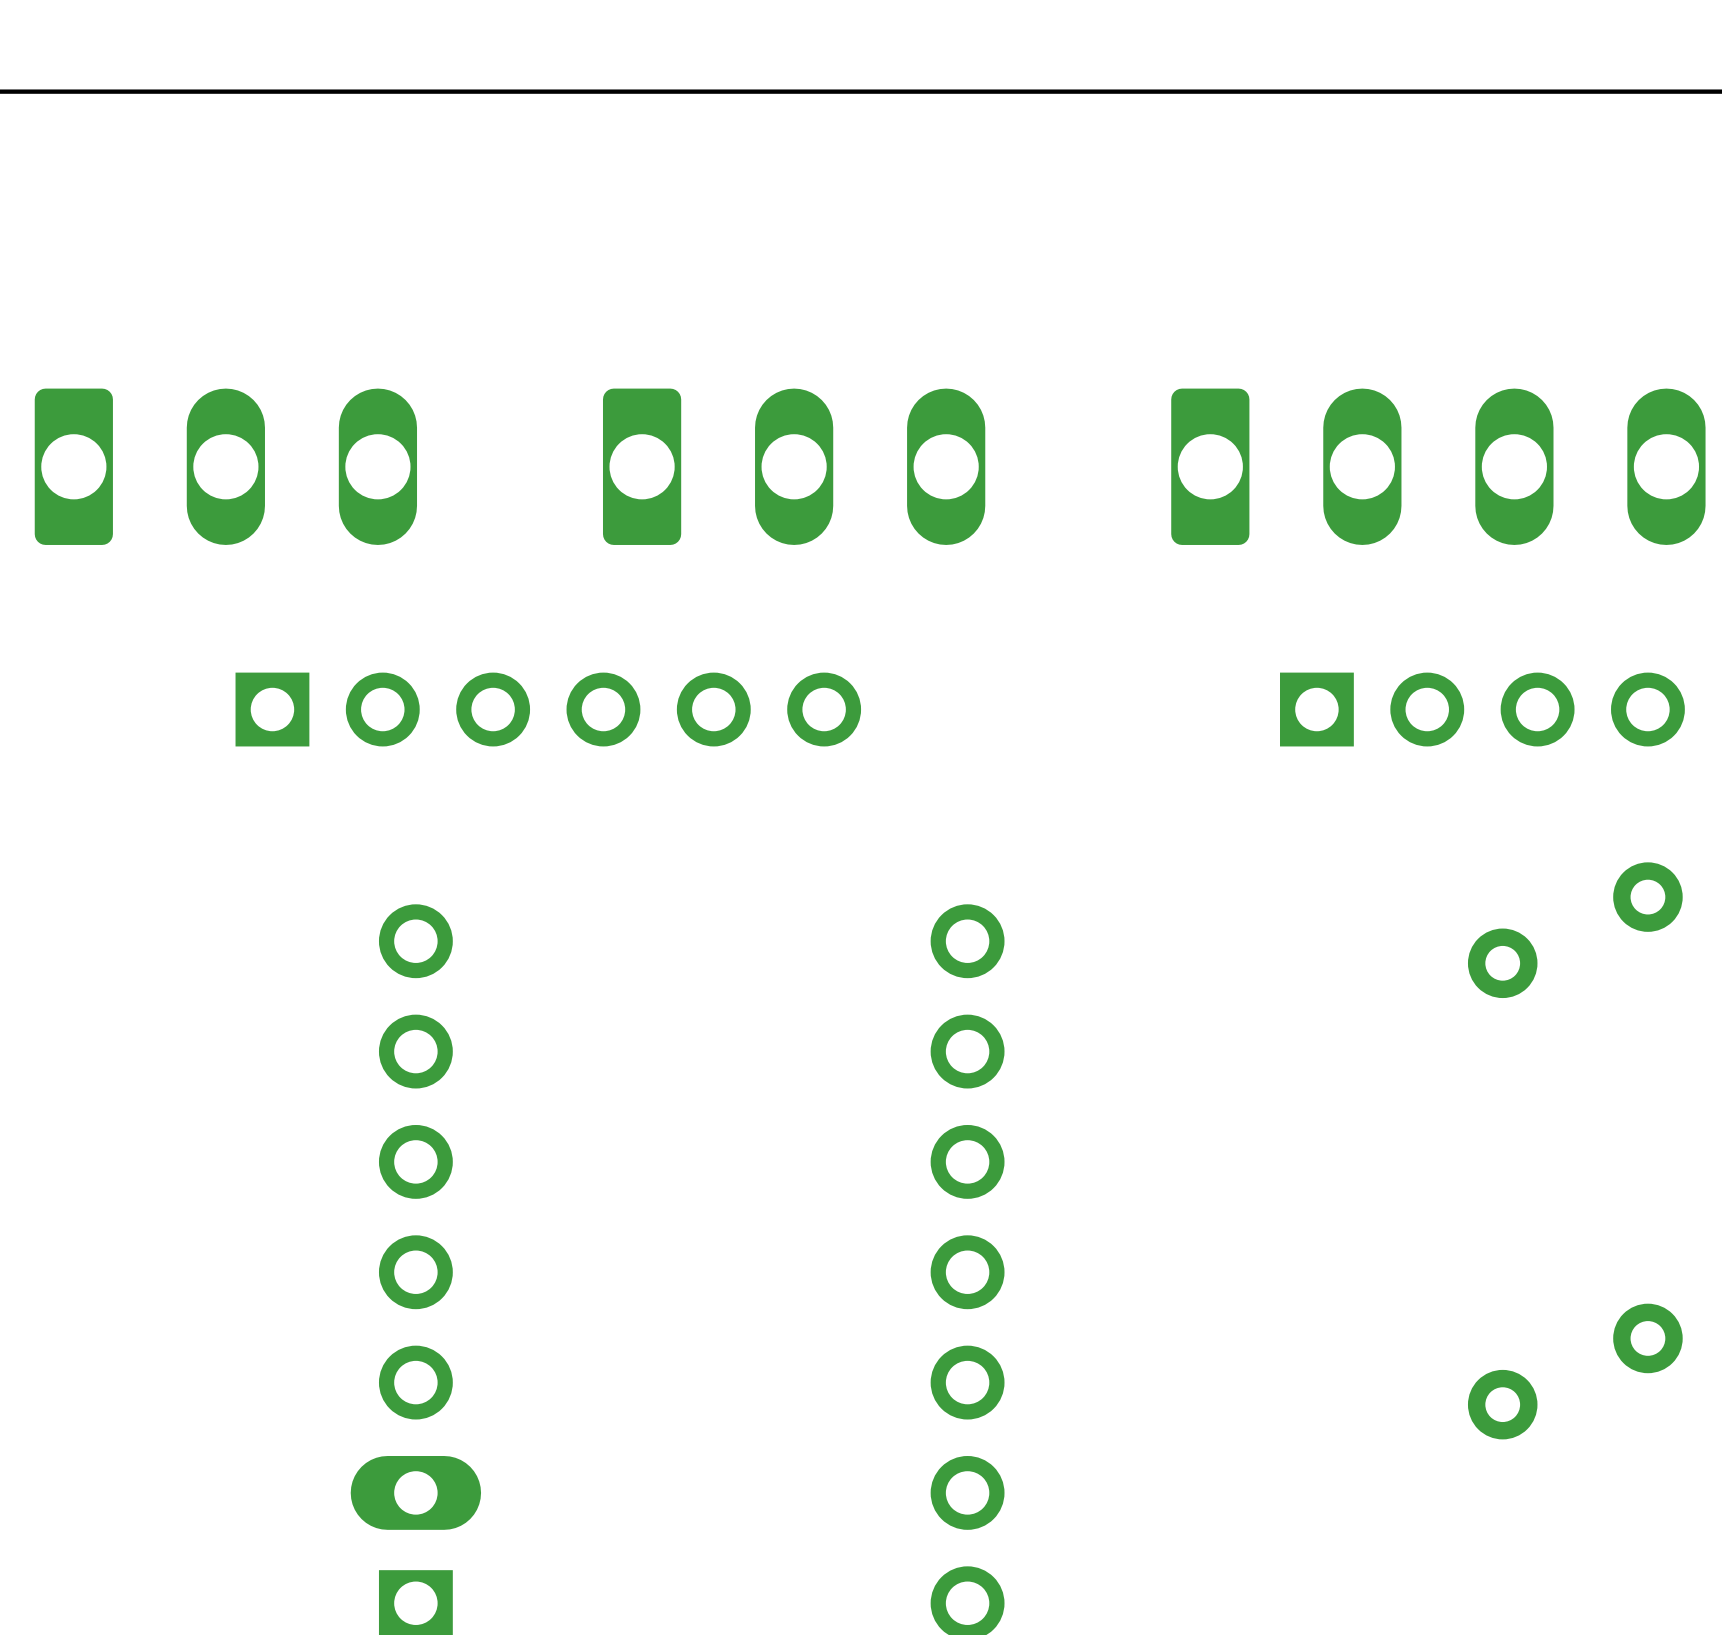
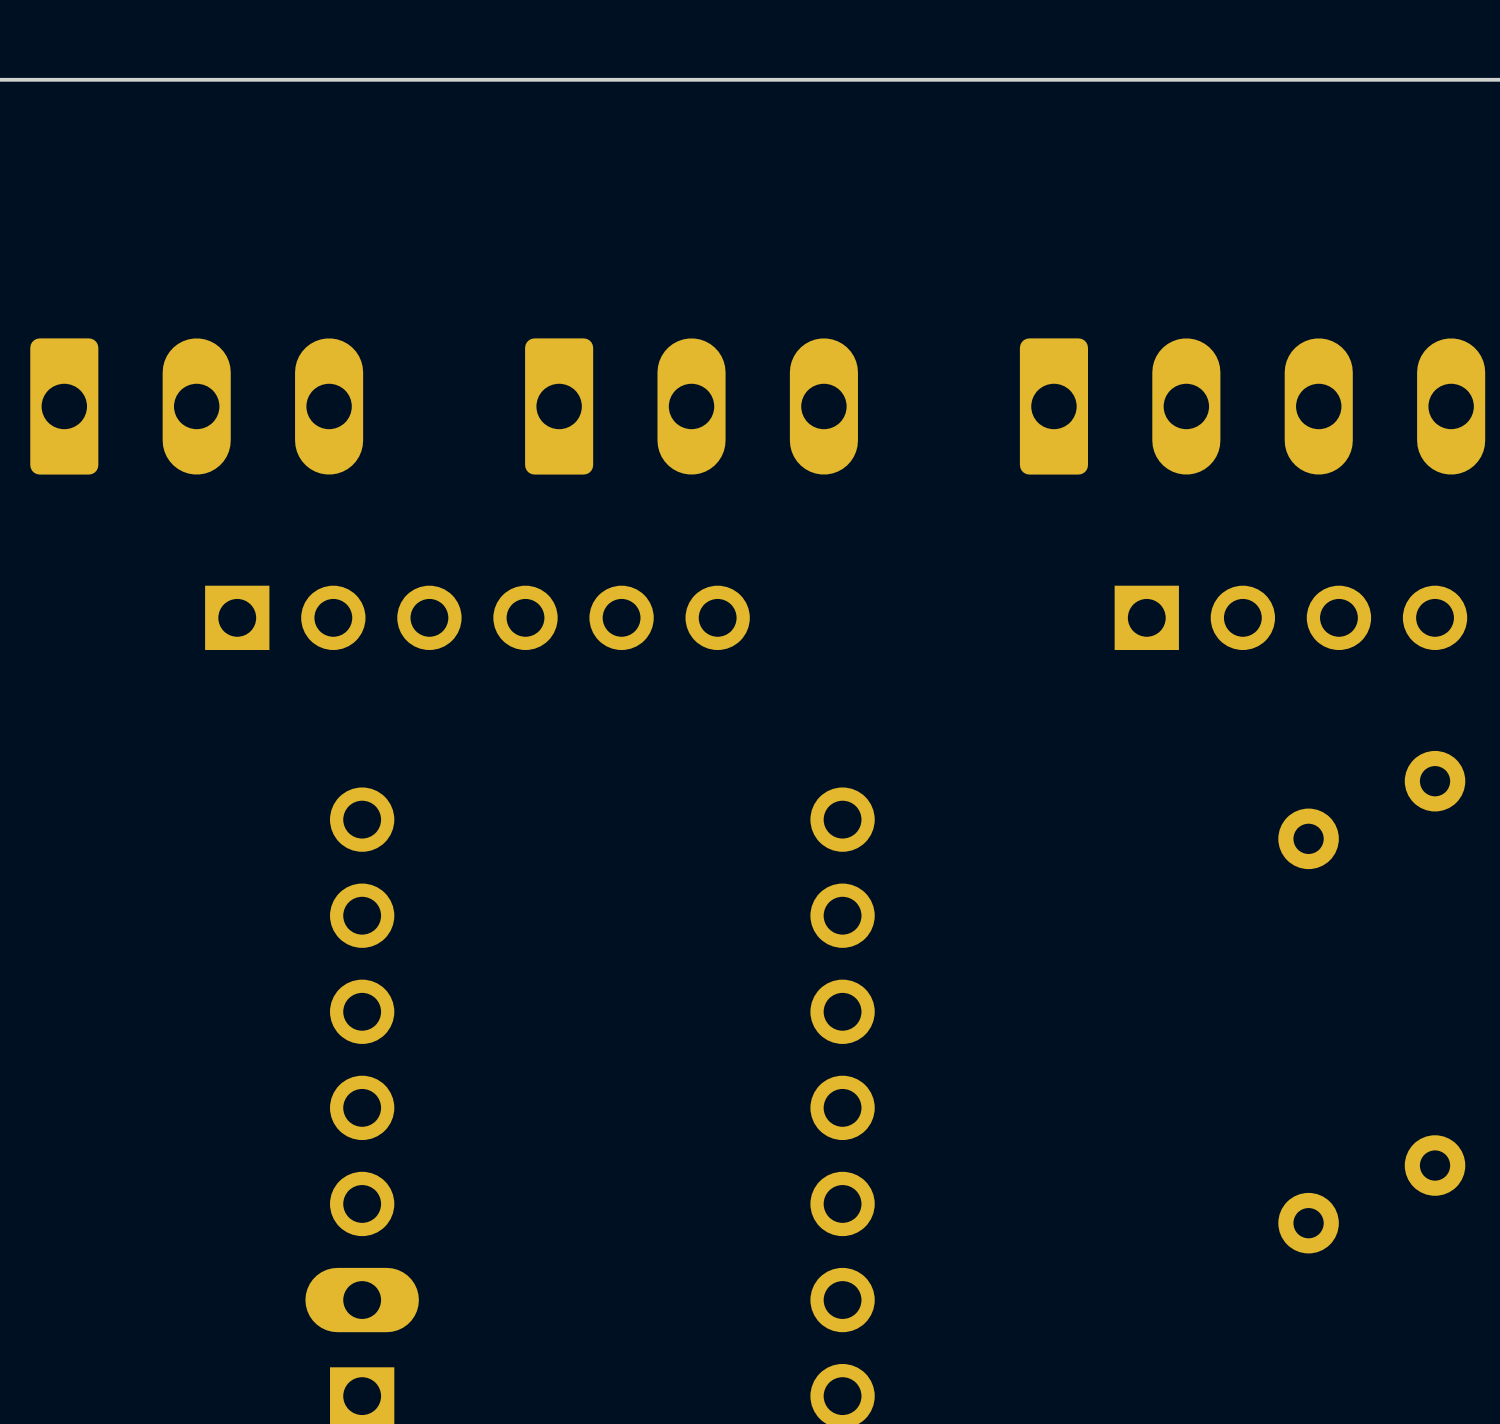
part footprint: [34, 388, 418, 545] -> [30, 338, 364, 475]
part footprint: [602, 388, 986, 545] -> [525, 338, 858, 475]
part footprint: [1171, 388, 1706, 545] -> [1019, 338, 1486, 475]

